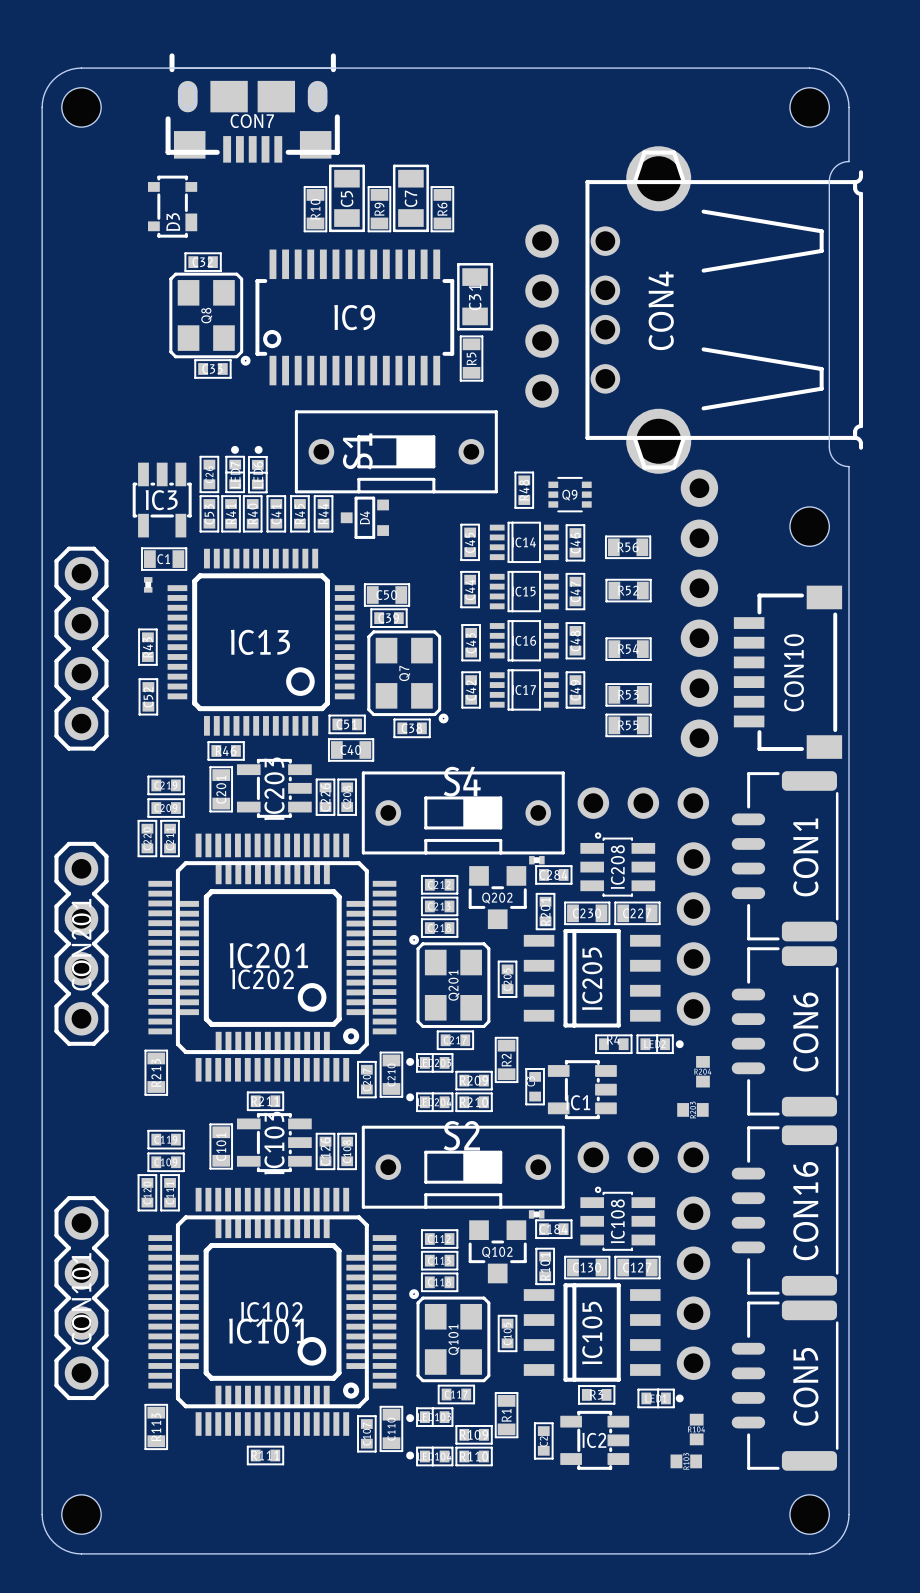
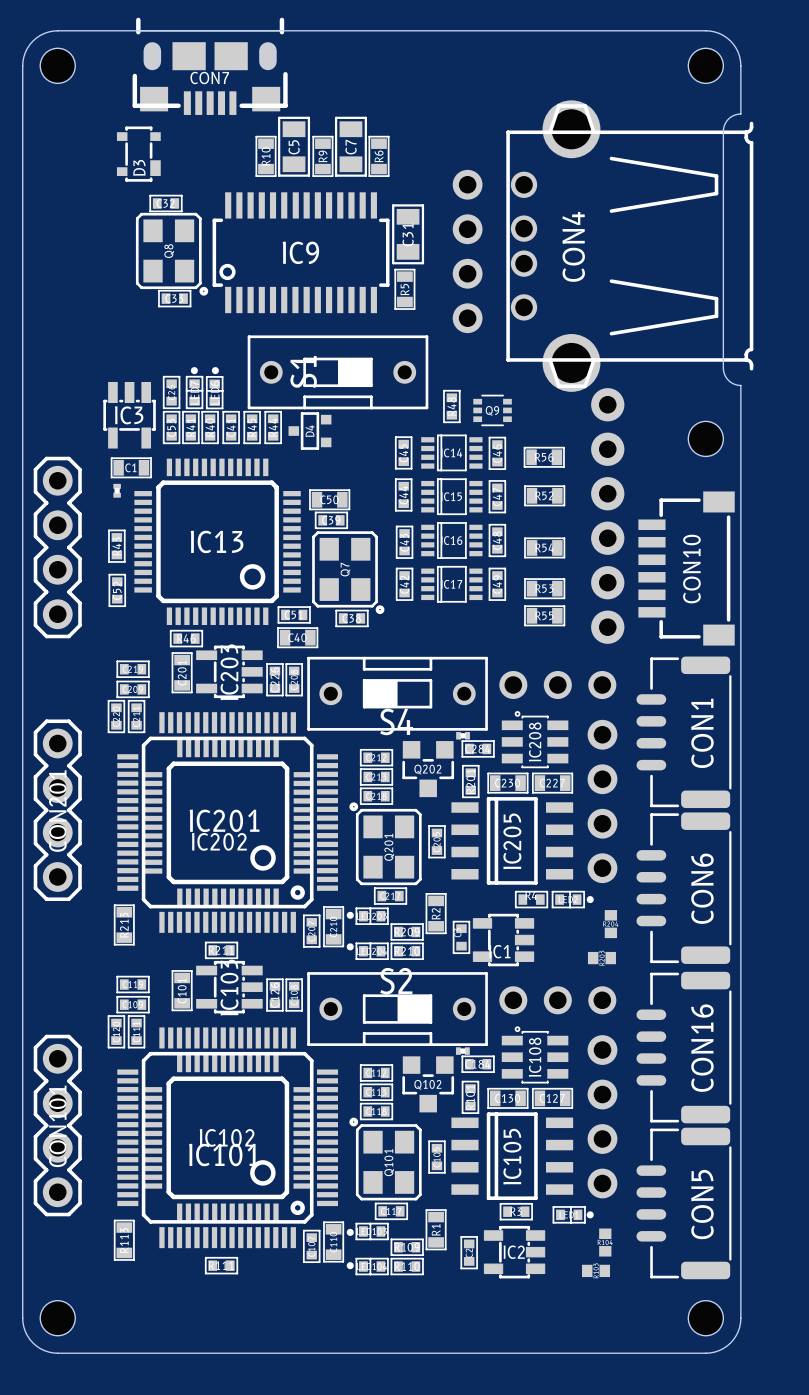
S4 rotation: 0° (463, 812) -> 180° (397, 693)

